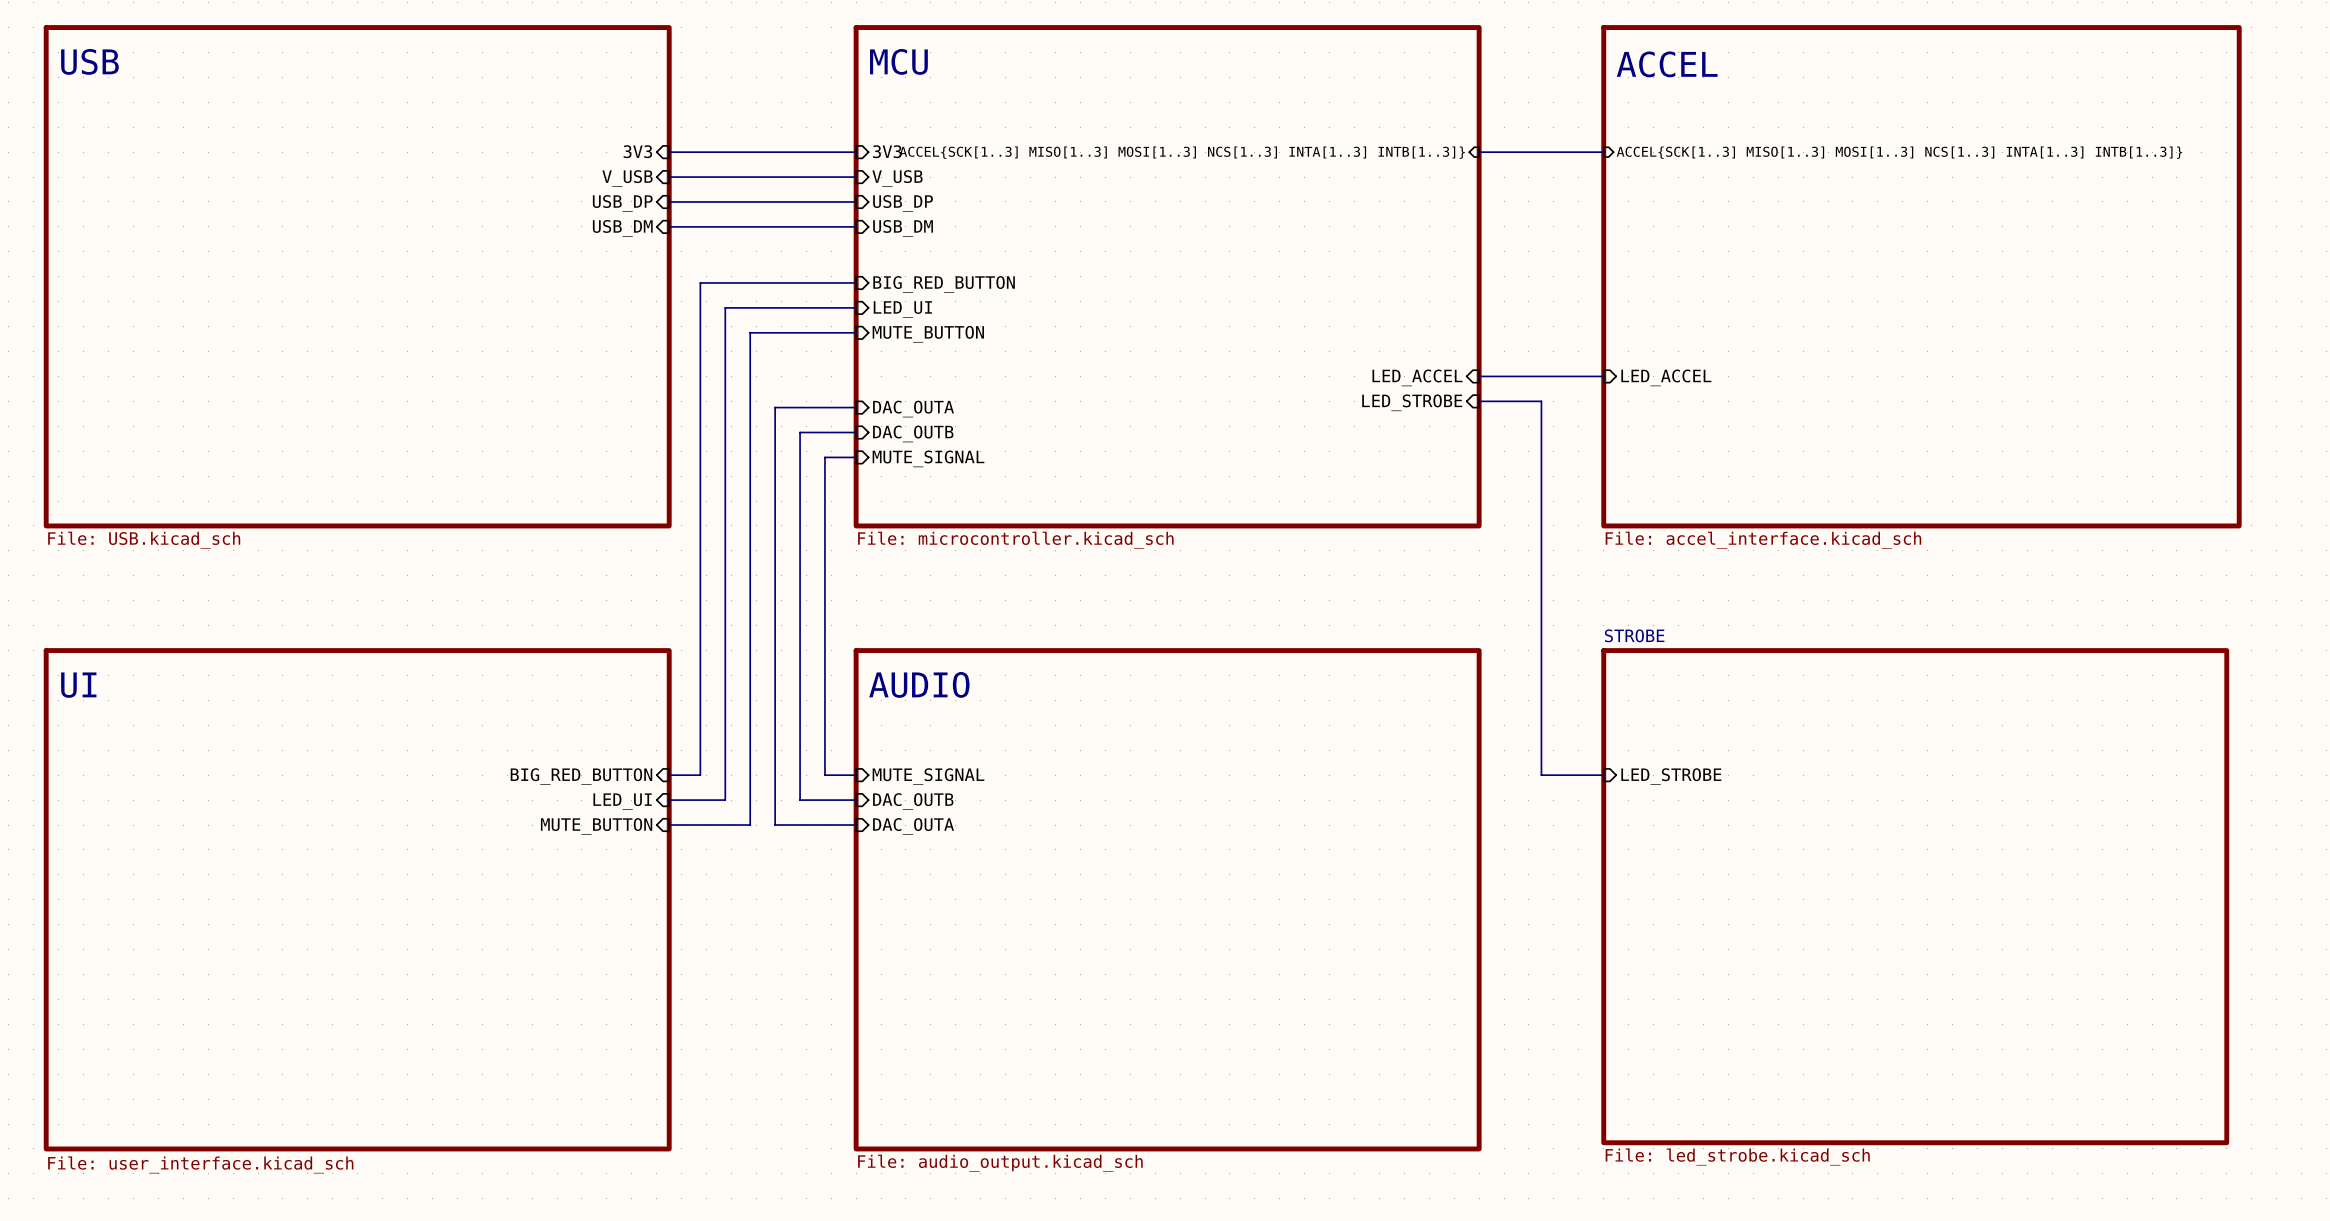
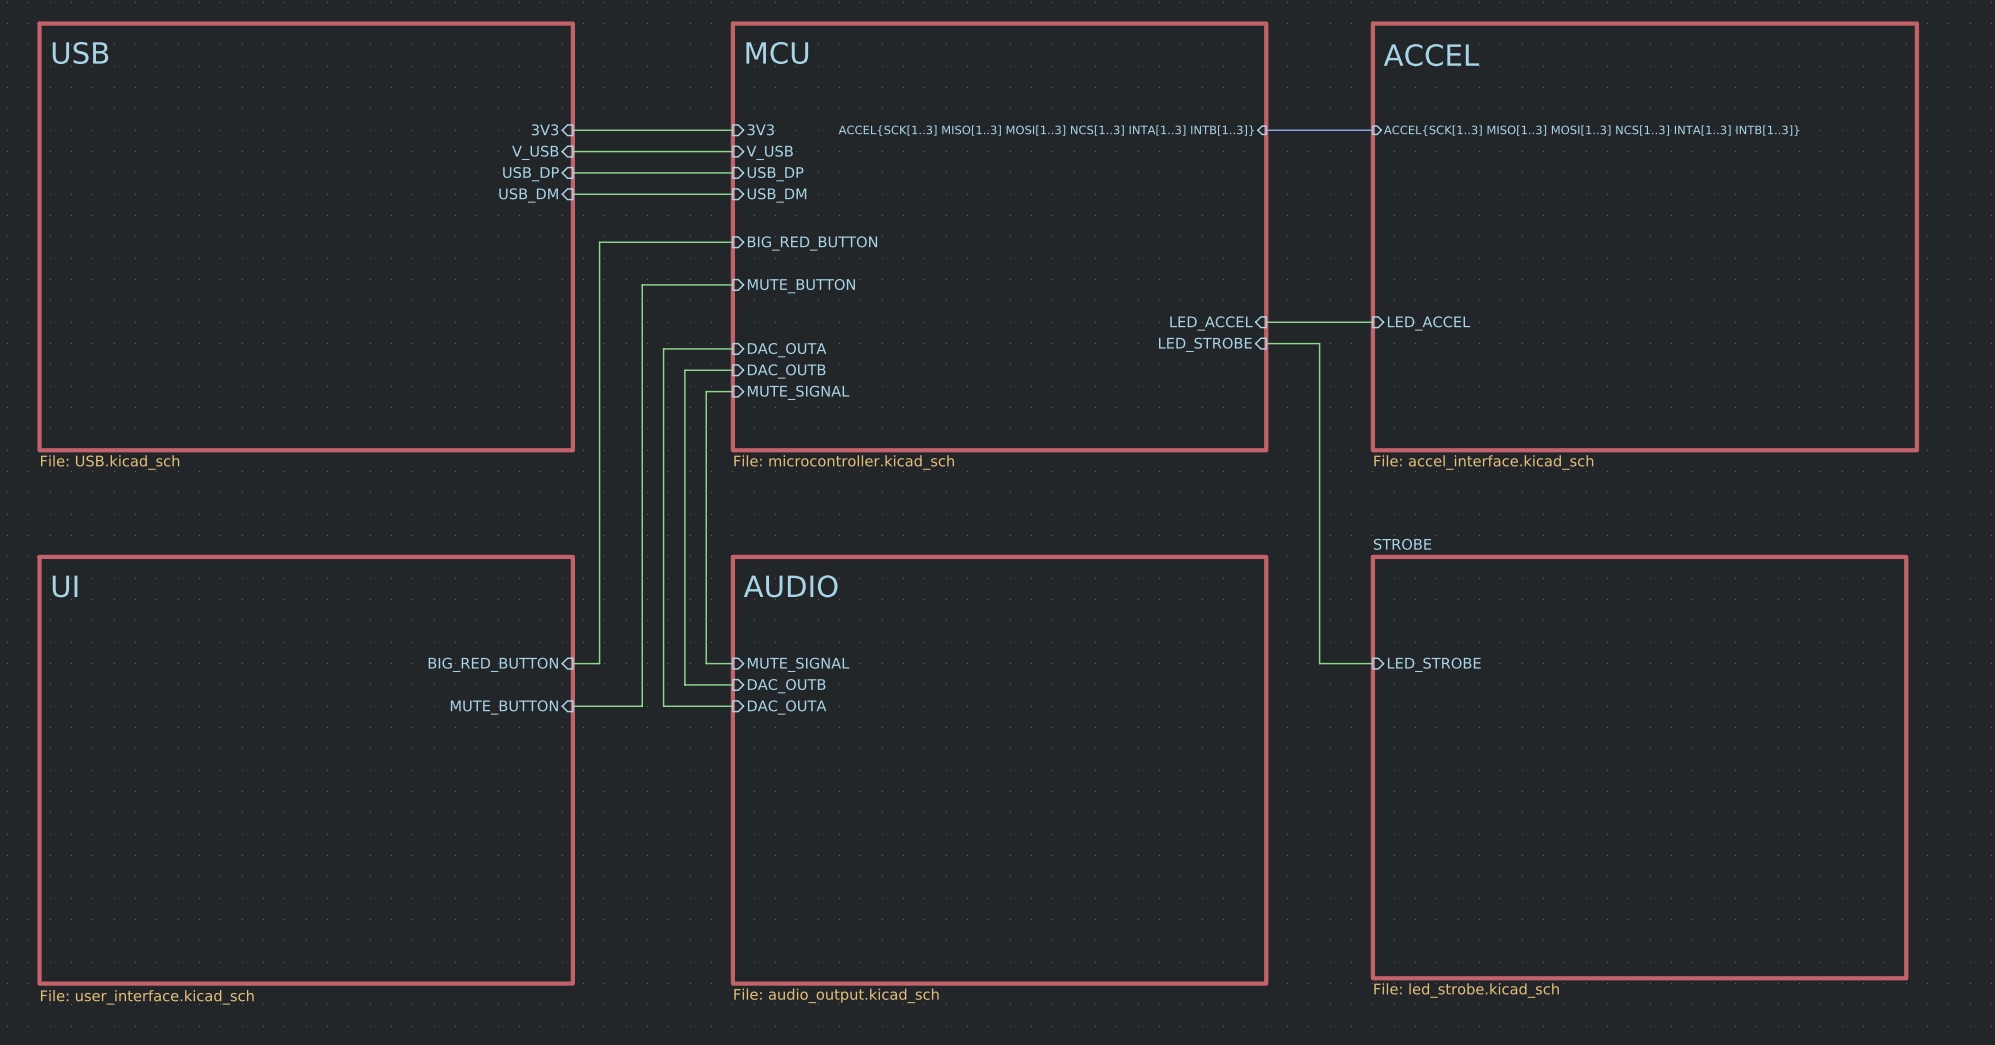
wire: (856, 307) (725, 307) (725, 800) (669, 800) -> none
sheet pin: LED_UI (902, 309) -> none
sheet pin: LED_UI (622, 801) -> none

